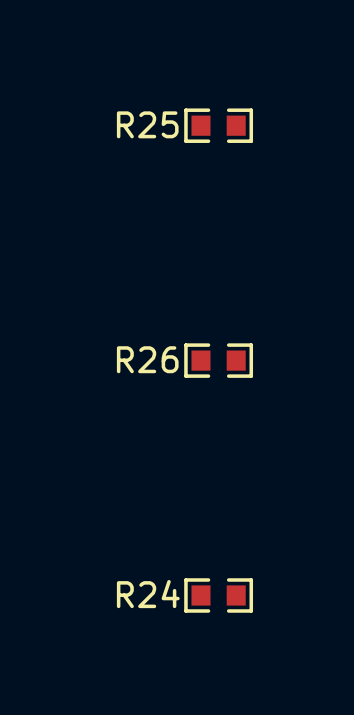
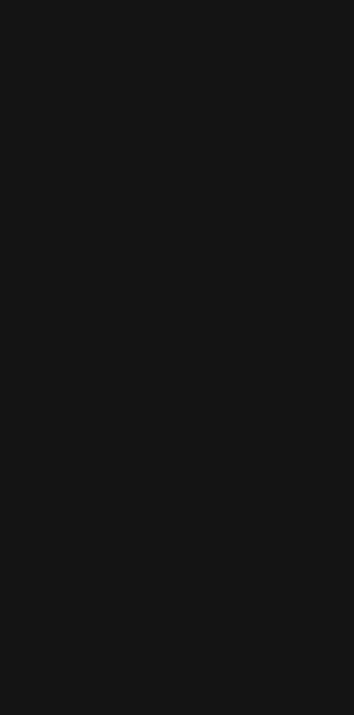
R25: (218, 125) -> none
R26: (218, 360) -> none
R24: (218, 595) -> none

